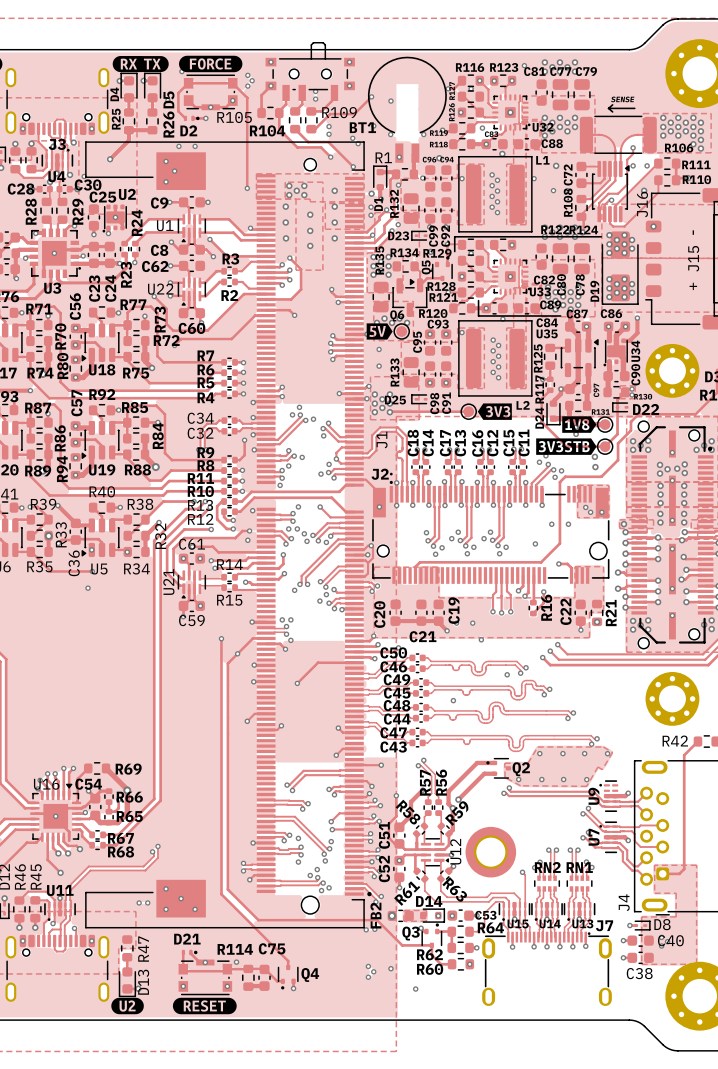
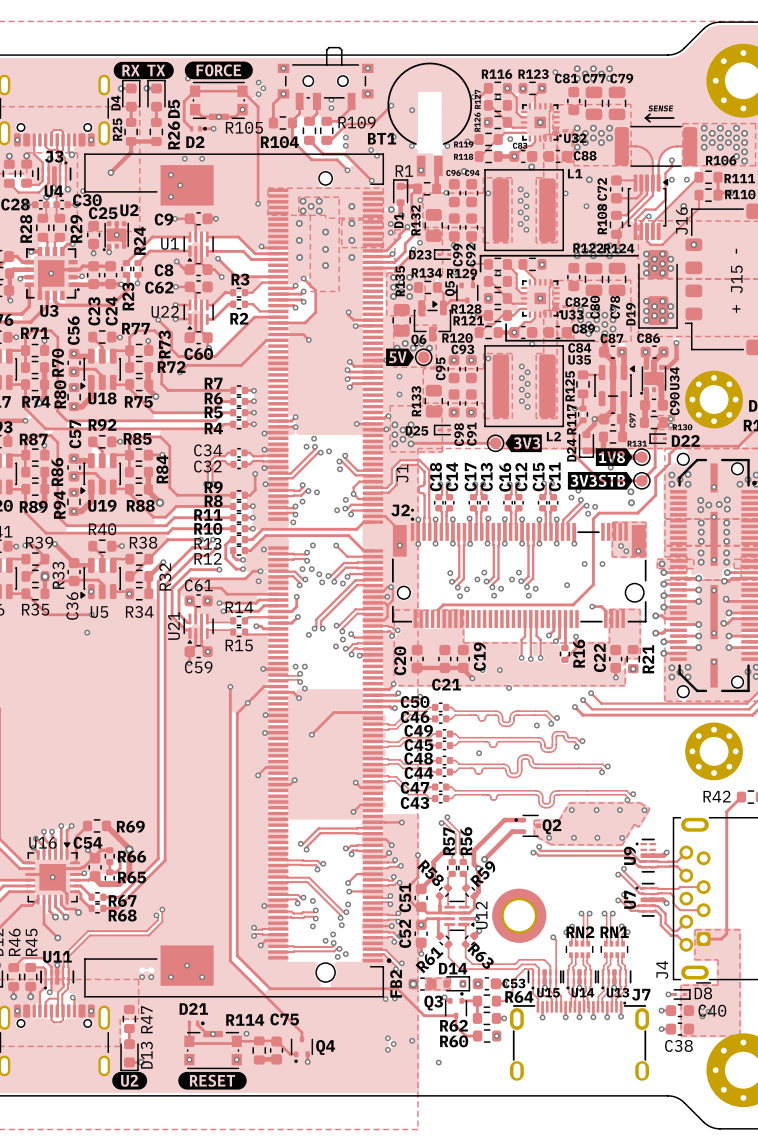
via: (166, 888) -> none
via: (139, 902) -> none
via: (147, 902) -> none
via: none -> (142, 977)
via: none -> (151, 977)

